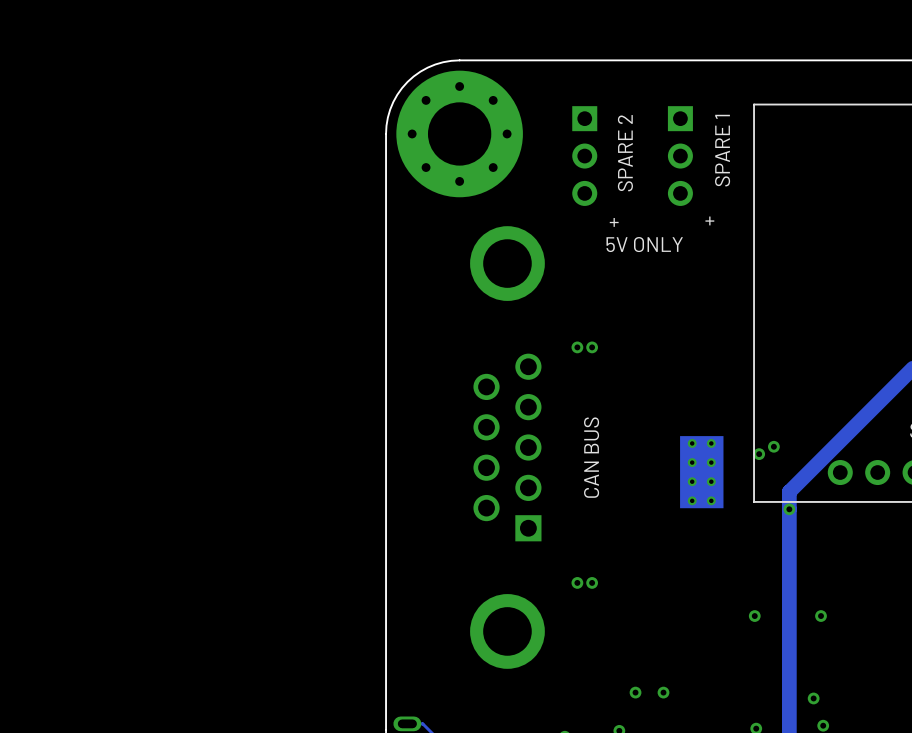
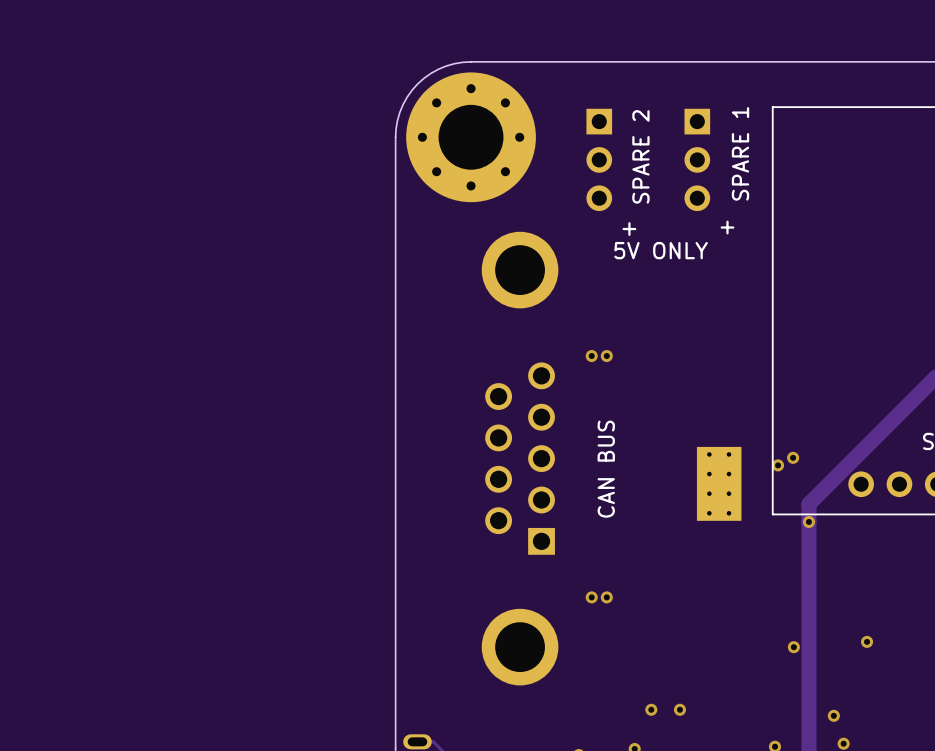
via: (754, 616) -> none
via: (821, 616) -> none
via: none -> (867, 641)
via: none -> (793, 647)

